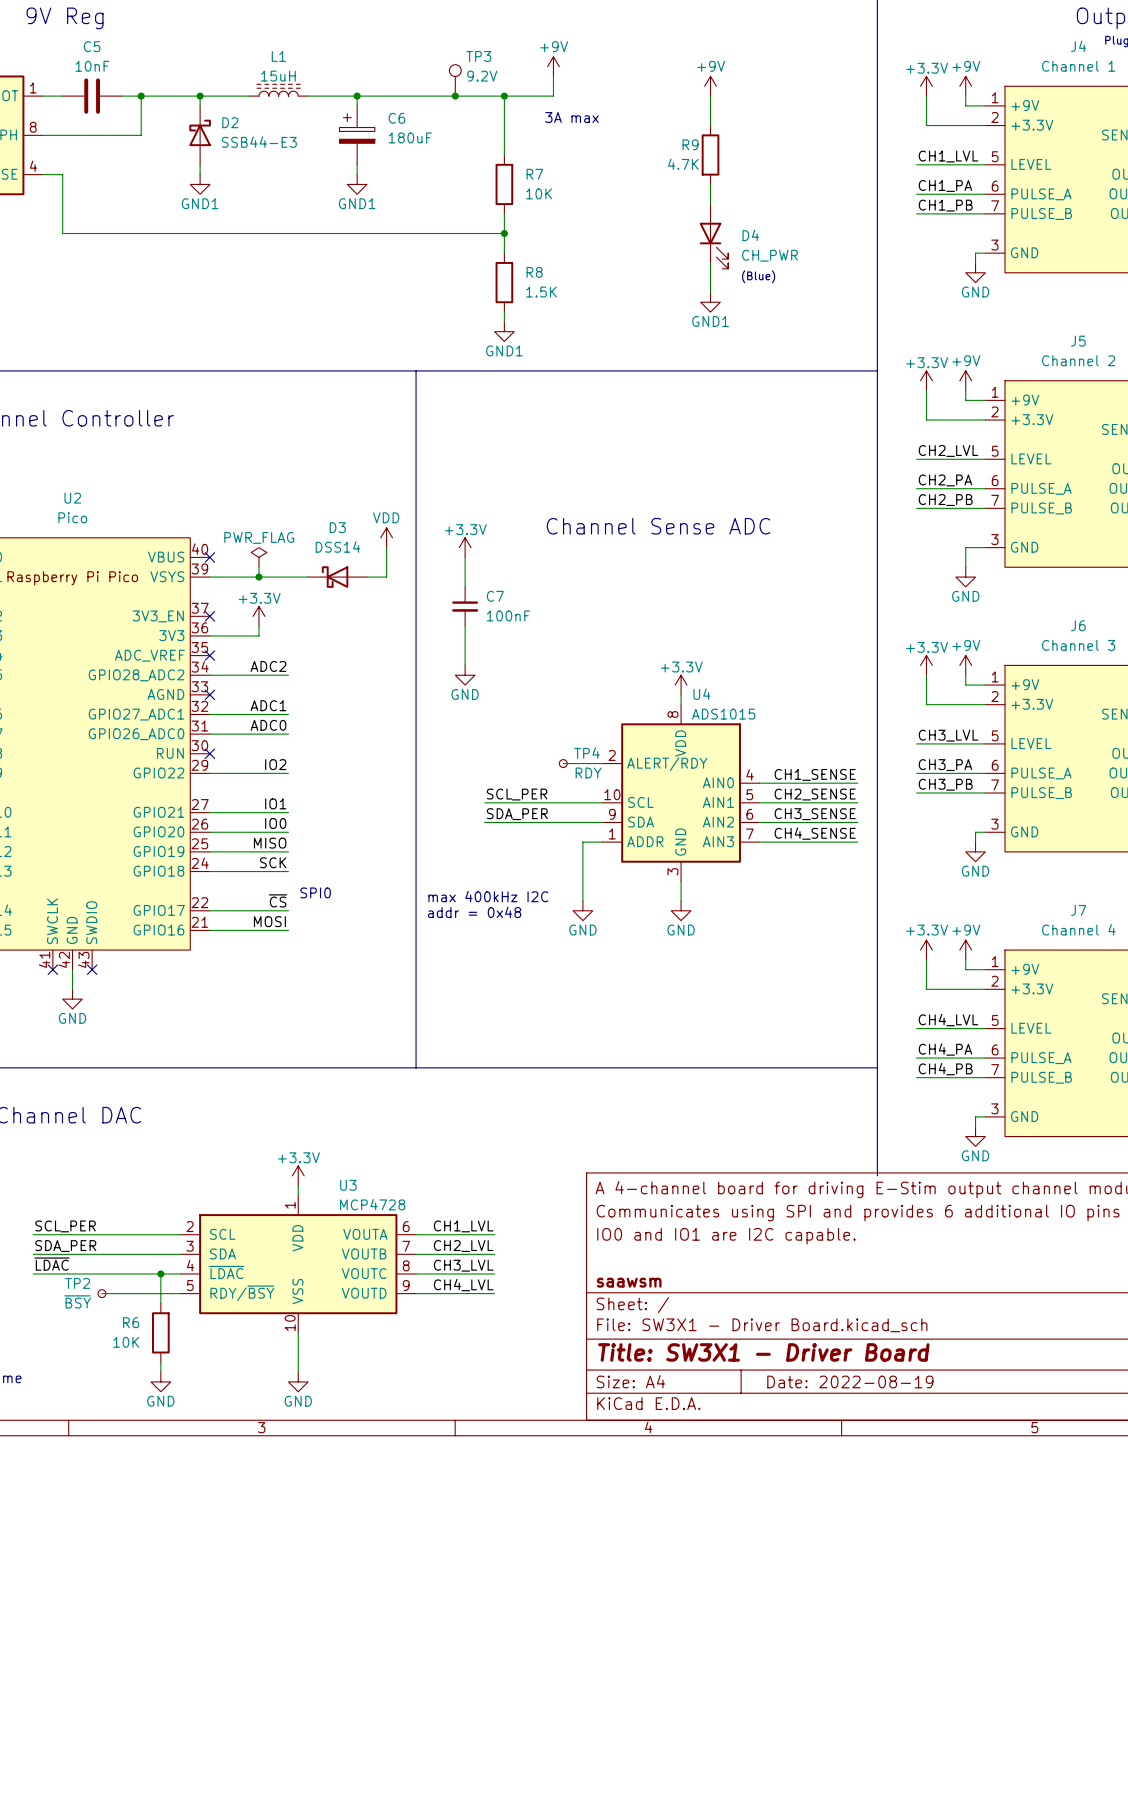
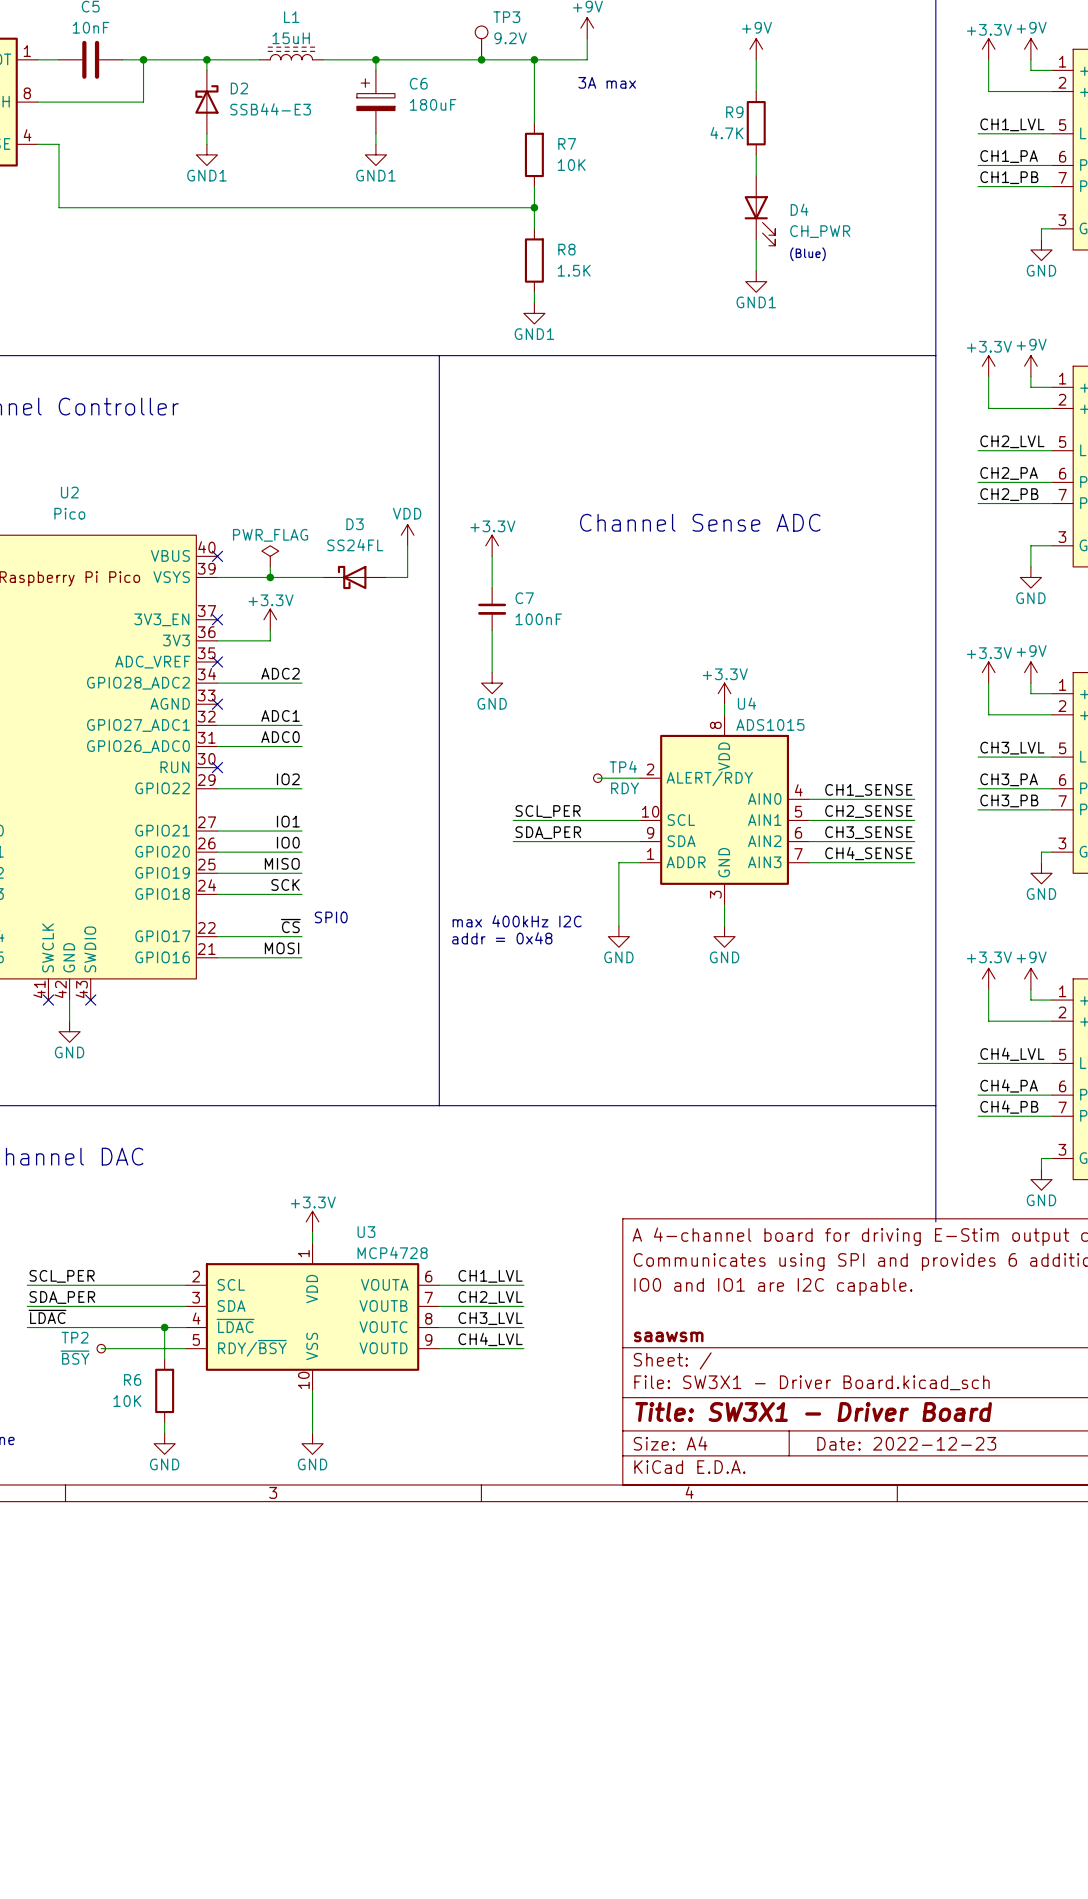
D3 value: DSS14 (337, 547) -> SS24FL (355, 545)
title block: Date: 2022-08-19 (850, 1381) -> Date: 2022-12-23 (906, 1443)

